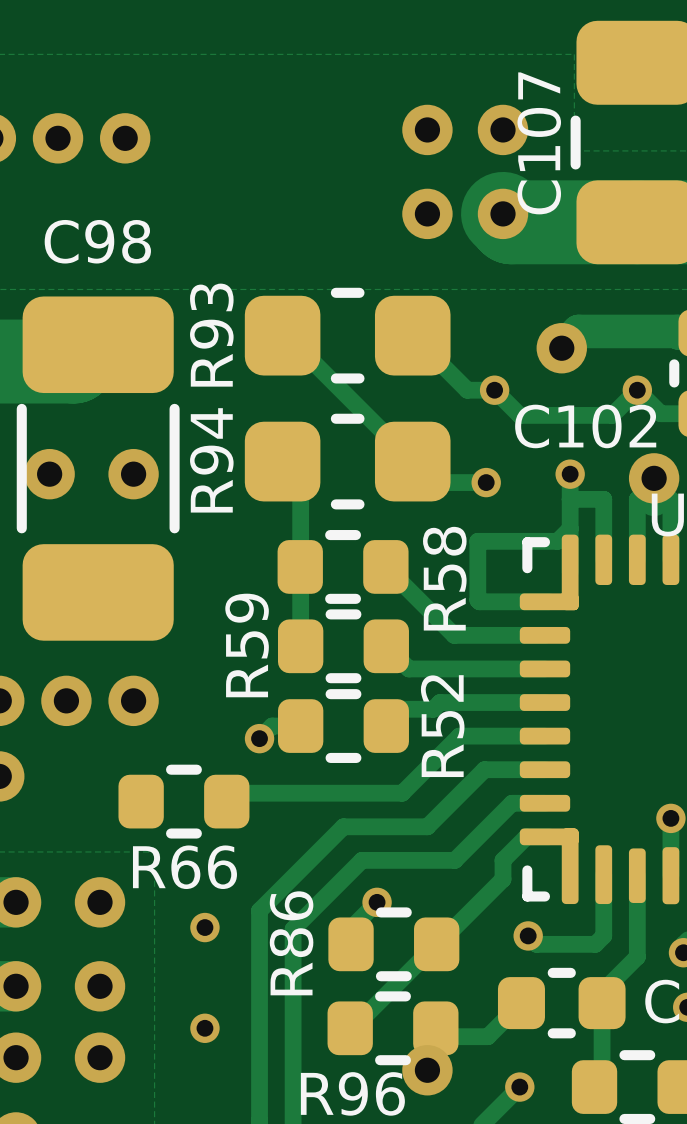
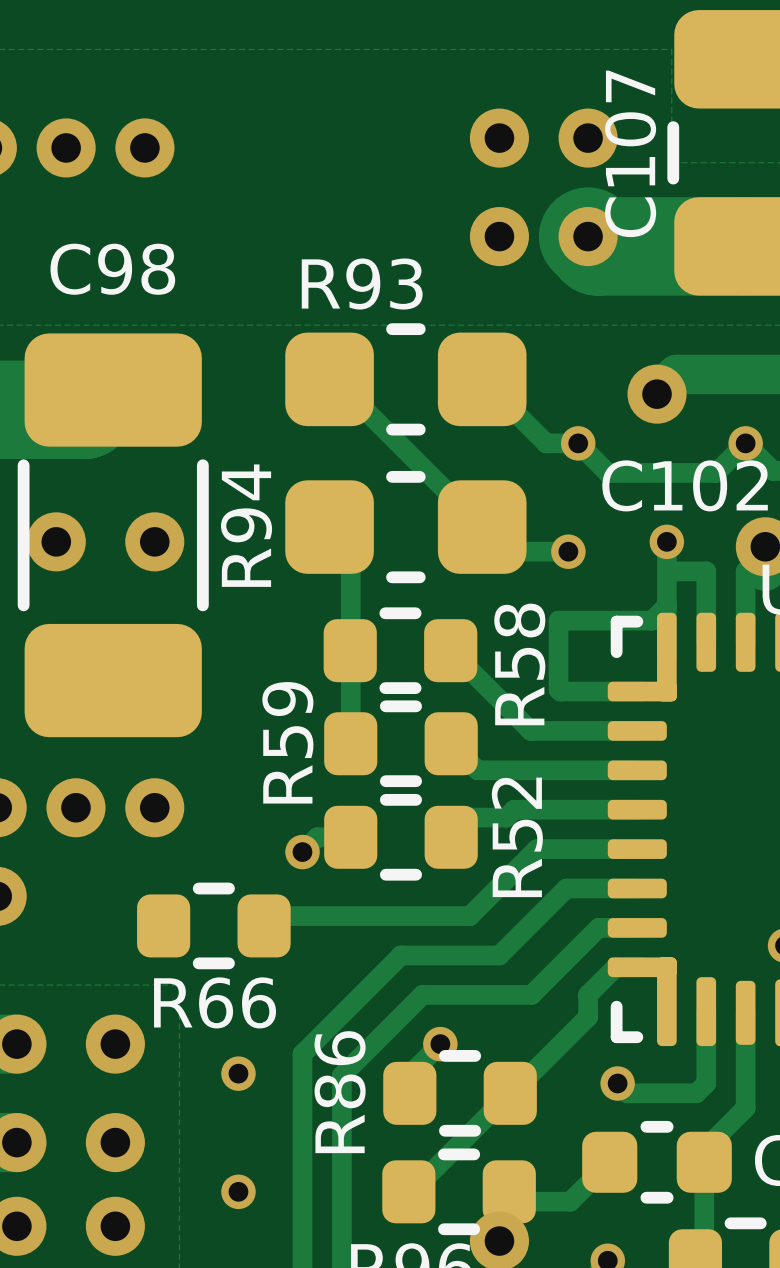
R93 name rotation: 0° (211, 335) -> 90° clockwise (362, 284)

